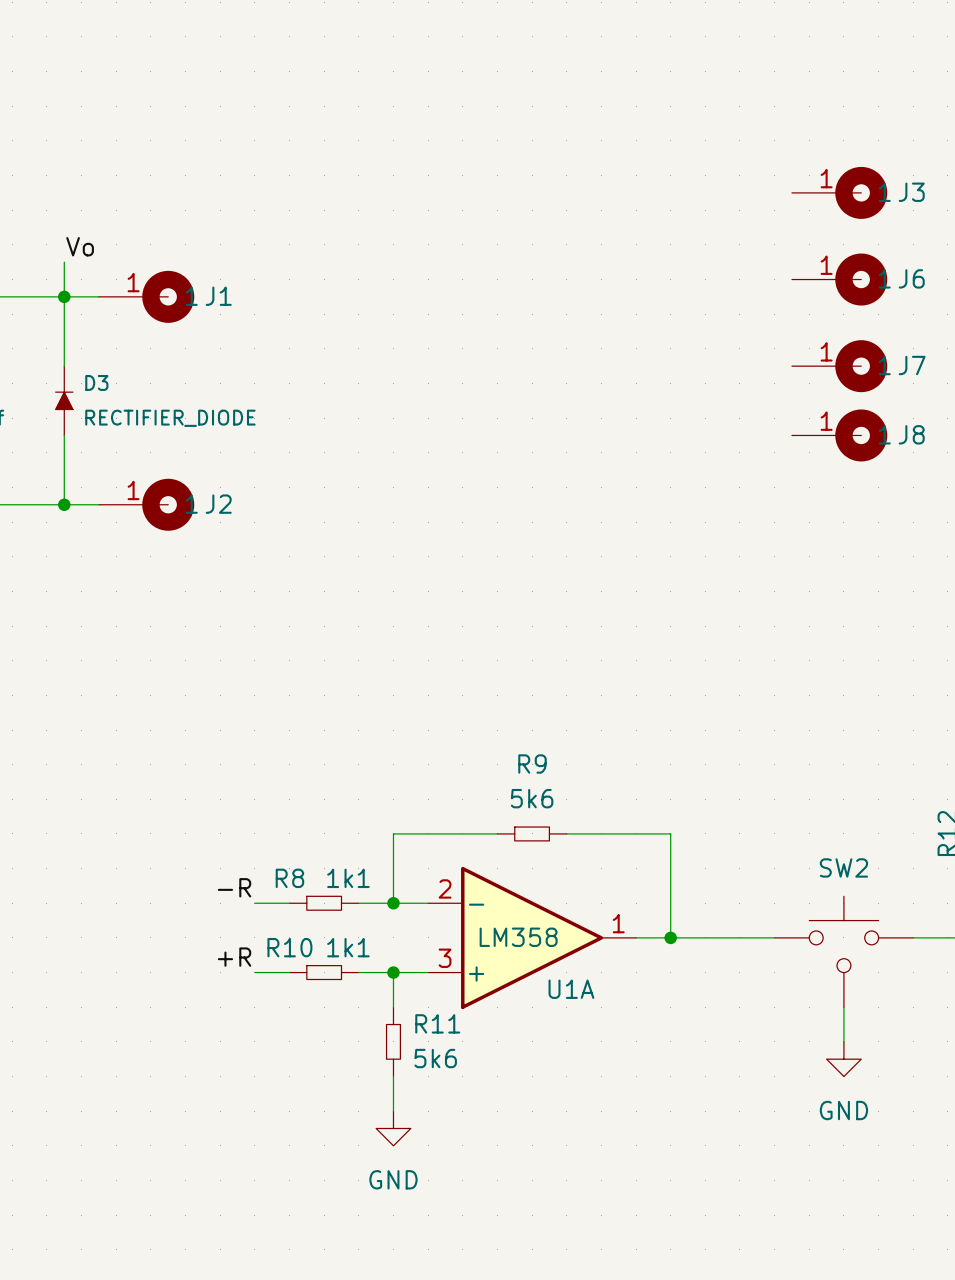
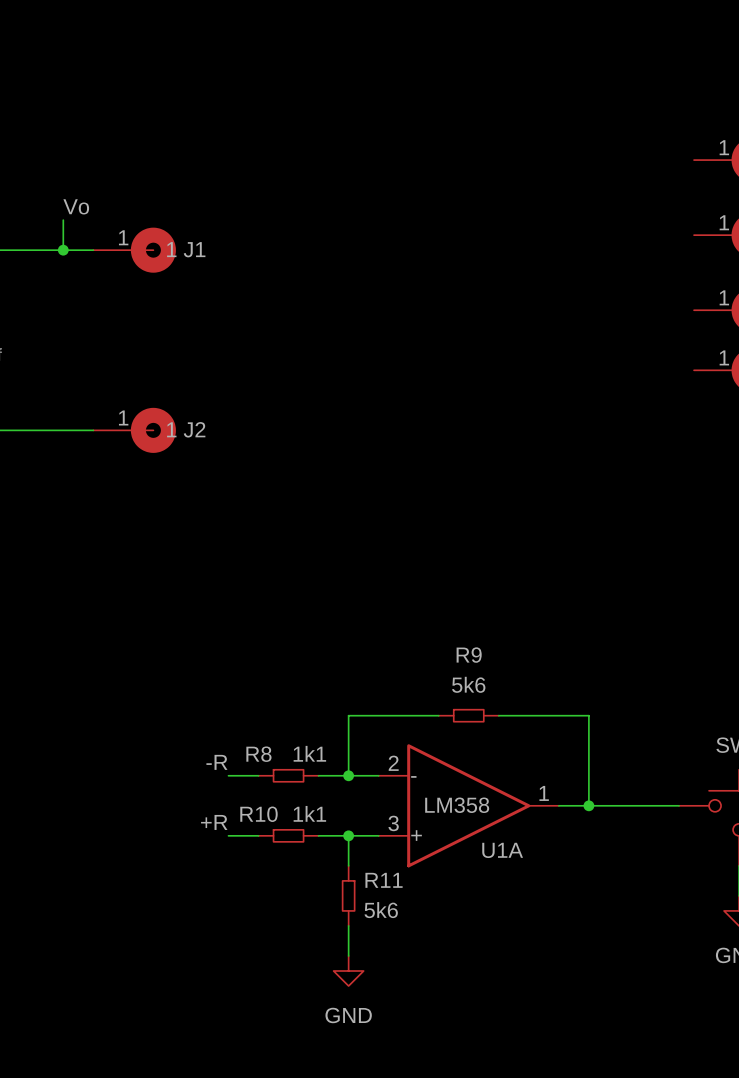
wire: (64, 296) (64, 366) -> none
D3: RECTIFIER_DIODE (64, 400) -> none
wire: (64, 435) (64, 504) -> none
junction: (64, 504) -> none

